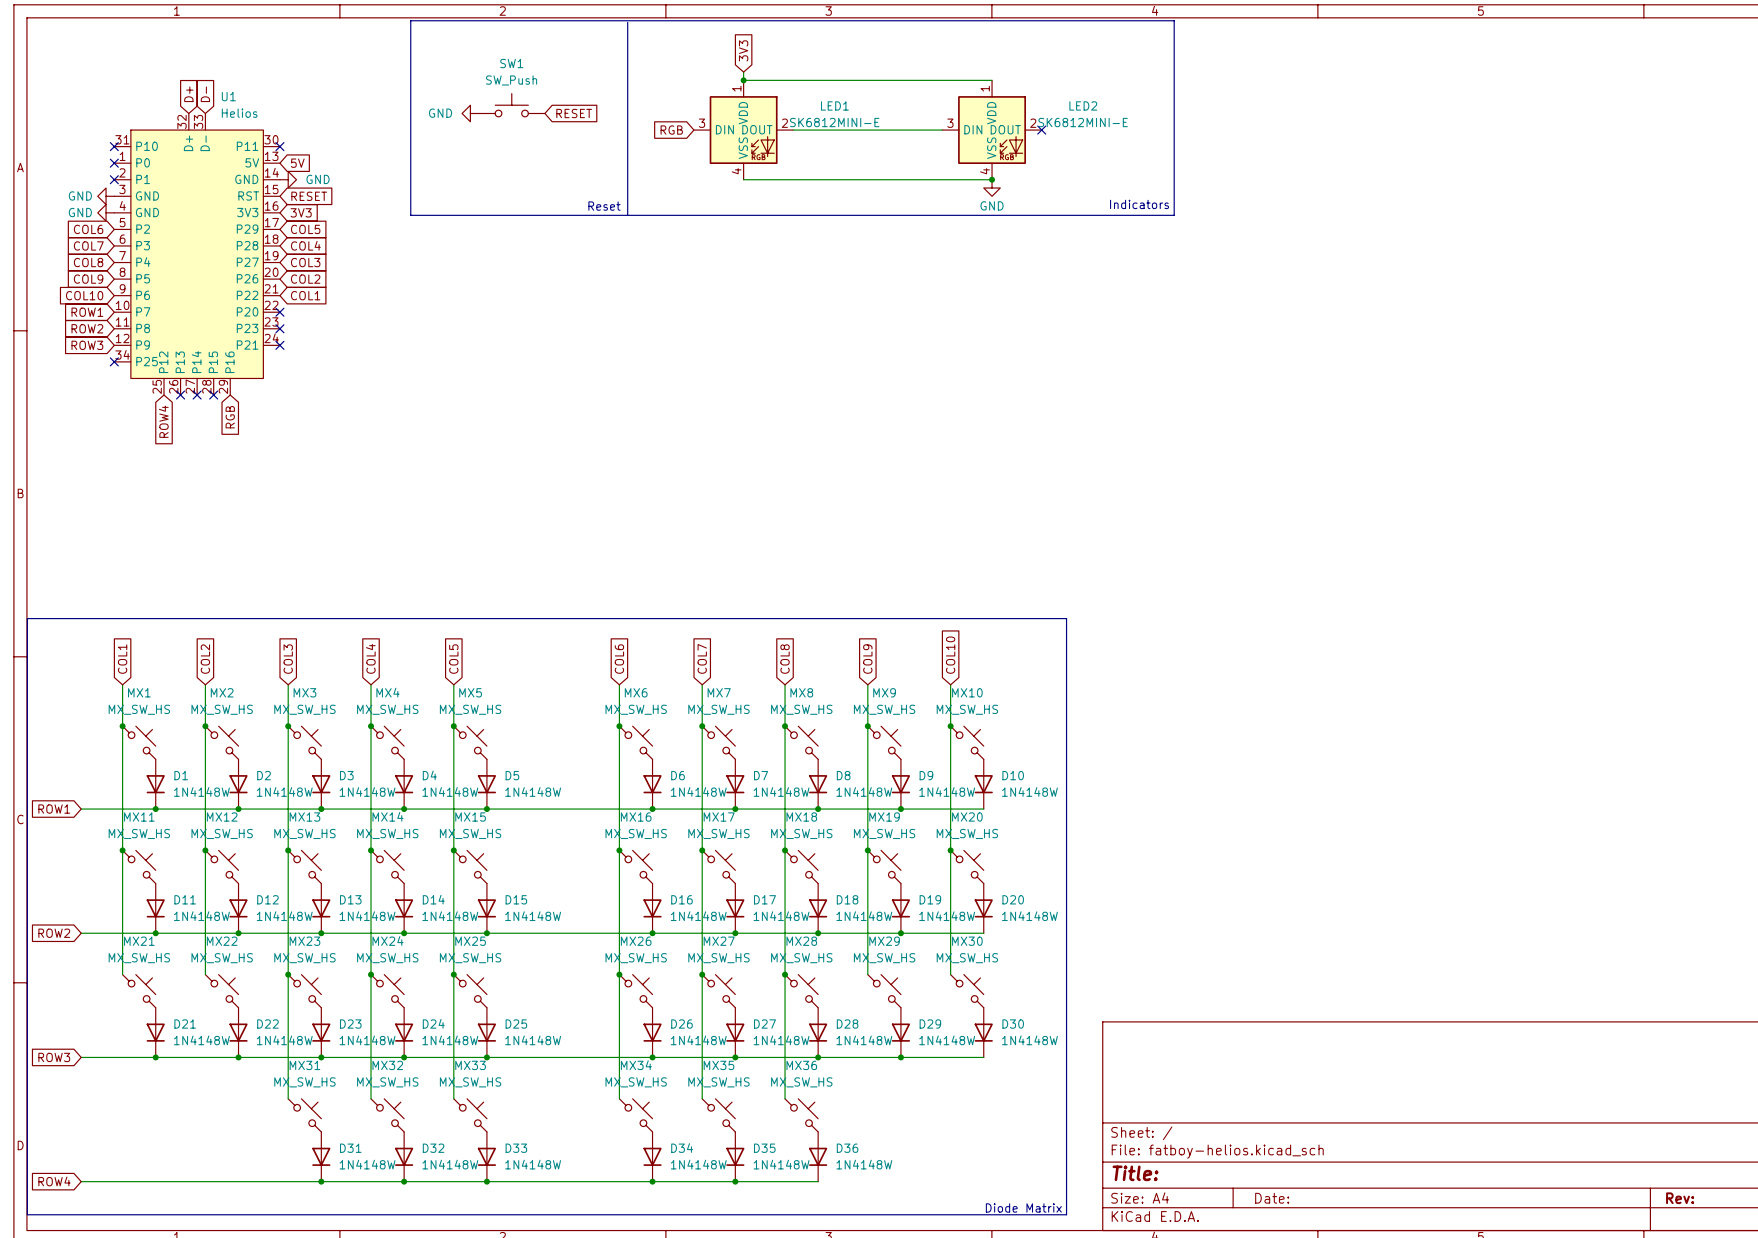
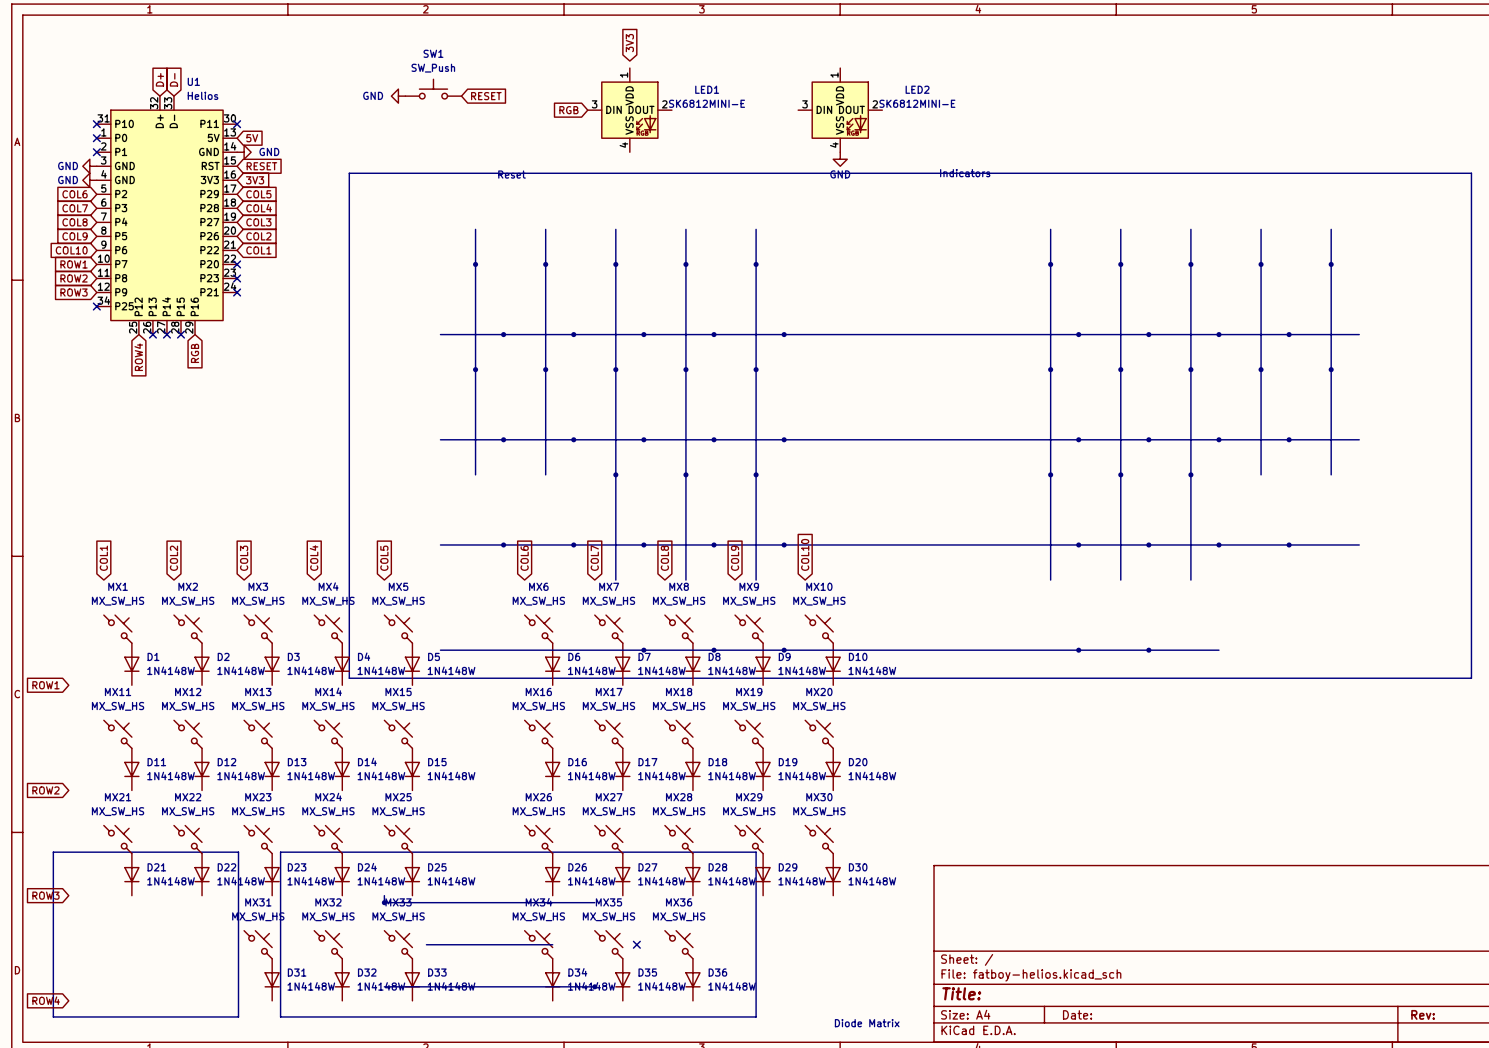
line: (410, 20) (1174, 20) (1174, 215) (410, 215) (410, 20) -> none
line: (627, 22) (627, 214) -> none
wire: (743, 72) (743, 80) (992, 80) -> none
junction: (743, 80) -> none
wire: (793, 130) (942, 130) -> none
no-connect mark: (1041, 130) -> none
wire: (743, 179) (992, 179) -> none
junction: (992, 179) -> none
line: none -> (349, 173) (1471, 173) (1471, 678) (349, 678) (349, 173)
wire: none -> (475, 229) (475, 474)
wire: none -> (545, 229) (545, 474)
wire: none -> (615, 229) (615, 580)
wire: none -> (685, 229) (685, 580)
wire: none -> (756, 229) (756, 580)
wire: none -> (1050, 229) (1050, 580)
wire: none -> (1120, 229) (1120, 580)
wire: none -> (1190, 229) (1190, 580)
wire: none -> (1261, 229) (1261, 474)
wire: none -> (1331, 229) (1331, 474)
junction: none -> (475, 264)
junction: none -> (545, 264)
junction: none -> (615, 264)
junction: none -> (685, 264)
junction: none -> (756, 264)
junction: none -> (1050, 264)
junction: none -> (1120, 264)
junction: none -> (1190, 264)
junction: none -> (1261, 264)
junction: none -> (1331, 264)
wire: none -> (440, 334) (1359, 334)
junction: none -> (503, 334)
junction: none -> (573, 334)
junction: none -> (643, 334)
junction: none -> (714, 334)
junction: none -> (784, 334)
junction: none -> (1078, 334)
junction: none -> (1148, 334)
junction: none -> (1218, 334)
junction: none -> (1289, 334)
junction: none -> (475, 369)
junction: none -> (545, 369)
junction: none -> (615, 369)
junction: none -> (685, 369)
junction: none -> (756, 369)
junction: none -> (1050, 369)
junction: none -> (1120, 369)
junction: none -> (1190, 369)
junction: none -> (1261, 369)
junction: none -> (1331, 369)
wire: none -> (440, 439) (1359, 439)
junction: none -> (503, 439)
junction: none -> (573, 439)
junction: none -> (643, 439)
junction: none -> (714, 439)
junction: none -> (784, 439)
junction: none -> (1078, 439)
junction: none -> (1148, 439)
junction: none -> (1218, 439)
junction: none -> (1289, 439)
junction: none -> (615, 474)
junction: none -> (685, 474)
junction: none -> (756, 474)
junction: none -> (1050, 474)
junction: none -> (1120, 474)
junction: none -> (1190, 474)
line: (27, 618) (1066, 618) (1066, 1214) (27, 1214) (27, 618) -> none
wire: none -> (440, 544) (1359, 544)
junction: none -> (503, 544)
junction: none -> (573, 544)
junction: none -> (643, 544)
junction: none -> (714, 544)
junction: none -> (784, 544)
junction: none -> (1078, 544)
junction: none -> (1148, 544)
junction: none -> (1218, 544)
junction: none -> (1289, 544)
wire: (122, 684) (122, 974) -> none
wire: (205, 684) (205, 974) -> none
wire: (288, 684) (288, 1098) -> none
wire: (371, 684) (371, 1098) -> none
wire: (453, 684) (453, 1057) -> none
wire: (619, 684) (619, 1098) -> none
wire: (702, 684) (702, 1098) -> none
wire: (785, 684) (785, 1098) -> none
wire: (867, 684) (867, 974) -> none
wire: (950, 684) (950, 974) -> none
junction: (122, 726) -> none
junction: (205, 726) -> none
junction: (288, 726) -> none
junction: (371, 726) -> none
junction: (453, 726) -> none
junction: (619, 726) -> none
junction: (702, 726) -> none
junction: (785, 726) -> none
junction: (867, 726) -> none
junction: (950, 726) -> none
wire: none -> (440, 650) (1218, 650)
junction: none -> (643, 650)
junction: none -> (714, 650)
junction: none -> (784, 650)
junction: none -> (1078, 650)
junction: none -> (1148, 650)
wire: (81, 809) (983, 809) -> none
junction: (155, 809) -> none
junction: (238, 809) -> none
junction: (321, 809) -> none
junction: (404, 809) -> none
junction: (486, 809) -> none
junction: (652, 809) -> none
junction: (735, 809) -> none
junction: (818, 809) -> none
junction: (900, 809) -> none
junction: (122, 850) -> none
junction: (205, 850) -> none
junction: (288, 850) -> none
junction: (371, 850) -> none
junction: (453, 850) -> none
junction: (619, 850) -> none
junction: (702, 850) -> none
junction: (785, 850) -> none
junction: (867, 850) -> none
junction: (950, 850) -> none
wire: (81, 933) (983, 933) -> none
junction: (155, 933) -> none
junction: (238, 933) -> none
junction: (321, 933) -> none
junction: (404, 933) -> none
junction: (486, 933) -> none
junction: (652, 933) -> none
junction: (735, 933) -> none
junction: (818, 933) -> none
junction: (900, 933) -> none
junction: (288, 974) -> none
junction: (371, 974) -> none
junction: (453, 974) -> none
junction: (619, 974) -> none
junction: (702, 974) -> none
junction: (785, 974) -> none
line: none -> (53, 852) (238, 852) (238, 1016) (53, 1016) (53, 852)
line: none -> (280, 852) (756, 852) (756, 1016) (280, 1016) (280, 852)
wire: (81, 1057) (983, 1057) -> none
junction: (155, 1057) -> none
junction: (238, 1057) -> none
junction: (321, 1057) -> none
junction: (404, 1057) -> none
junction: (486, 1057) -> none
junction: (652, 1057) -> none
junction: (735, 1057) -> none
junction: (818, 1057) -> none
junction: (900, 1057) -> none
wire: (453, 1065) (453, 1098) -> (384, 902) (594, 902)
junction: none -> (384, 902)
wire: none -> (426, 944) (552, 944)
no-connect mark: none -> (636, 944)
wire: none -> (384, 986) (594, 986)
junction: none -> (594, 986)
wire: (81, 1181) (818, 1181) -> none
junction: (321, 1181) -> none
junction: (404, 1181) -> none
junction: (486, 1181) -> none
junction: (652, 1181) -> none
junction: (735, 1181) -> none

